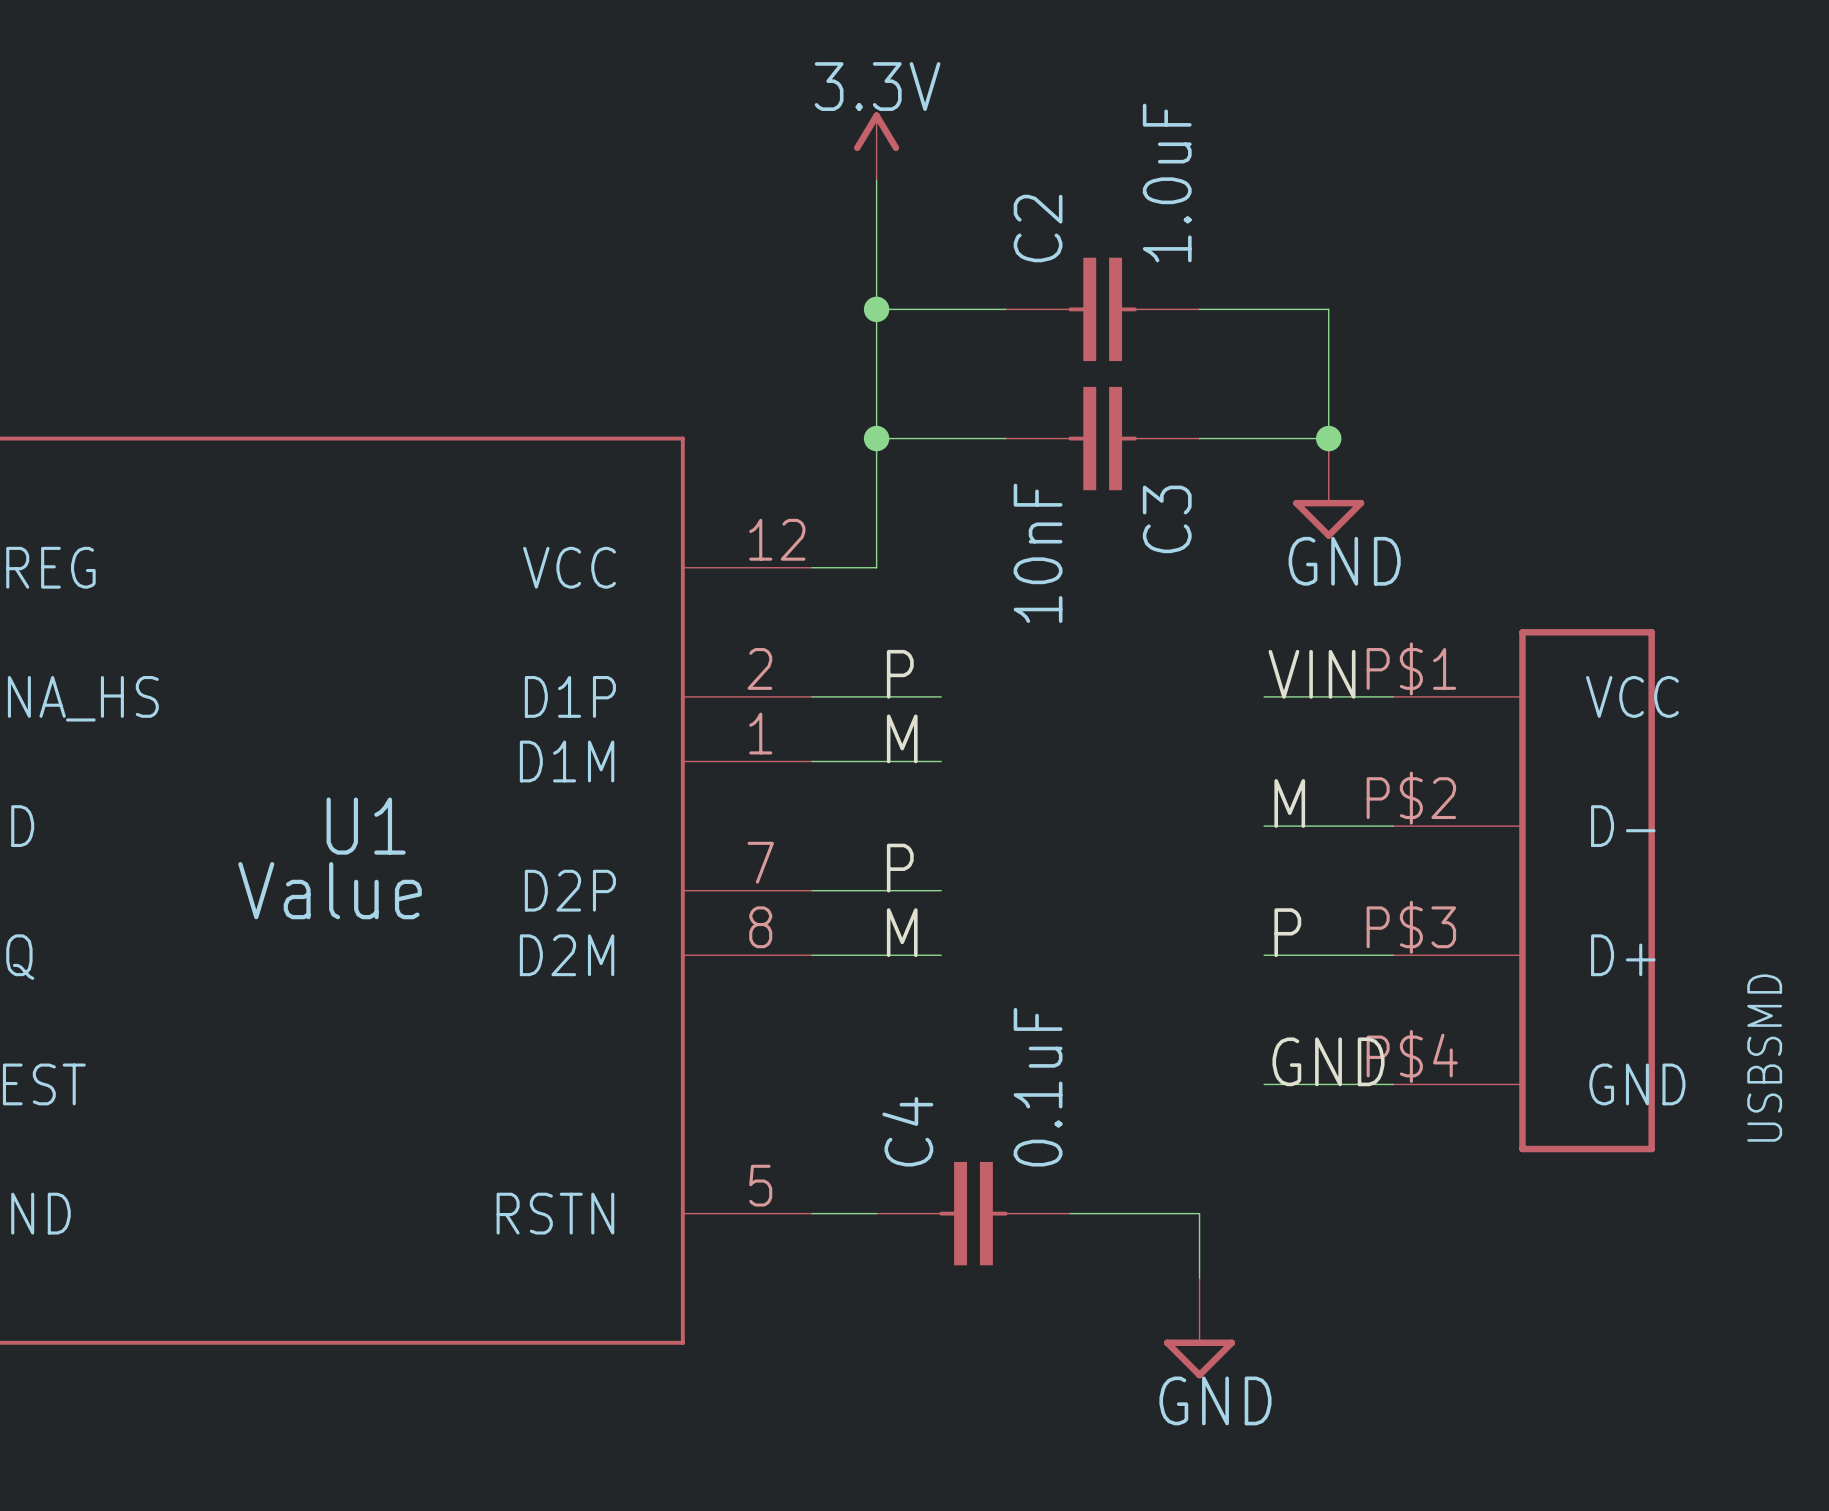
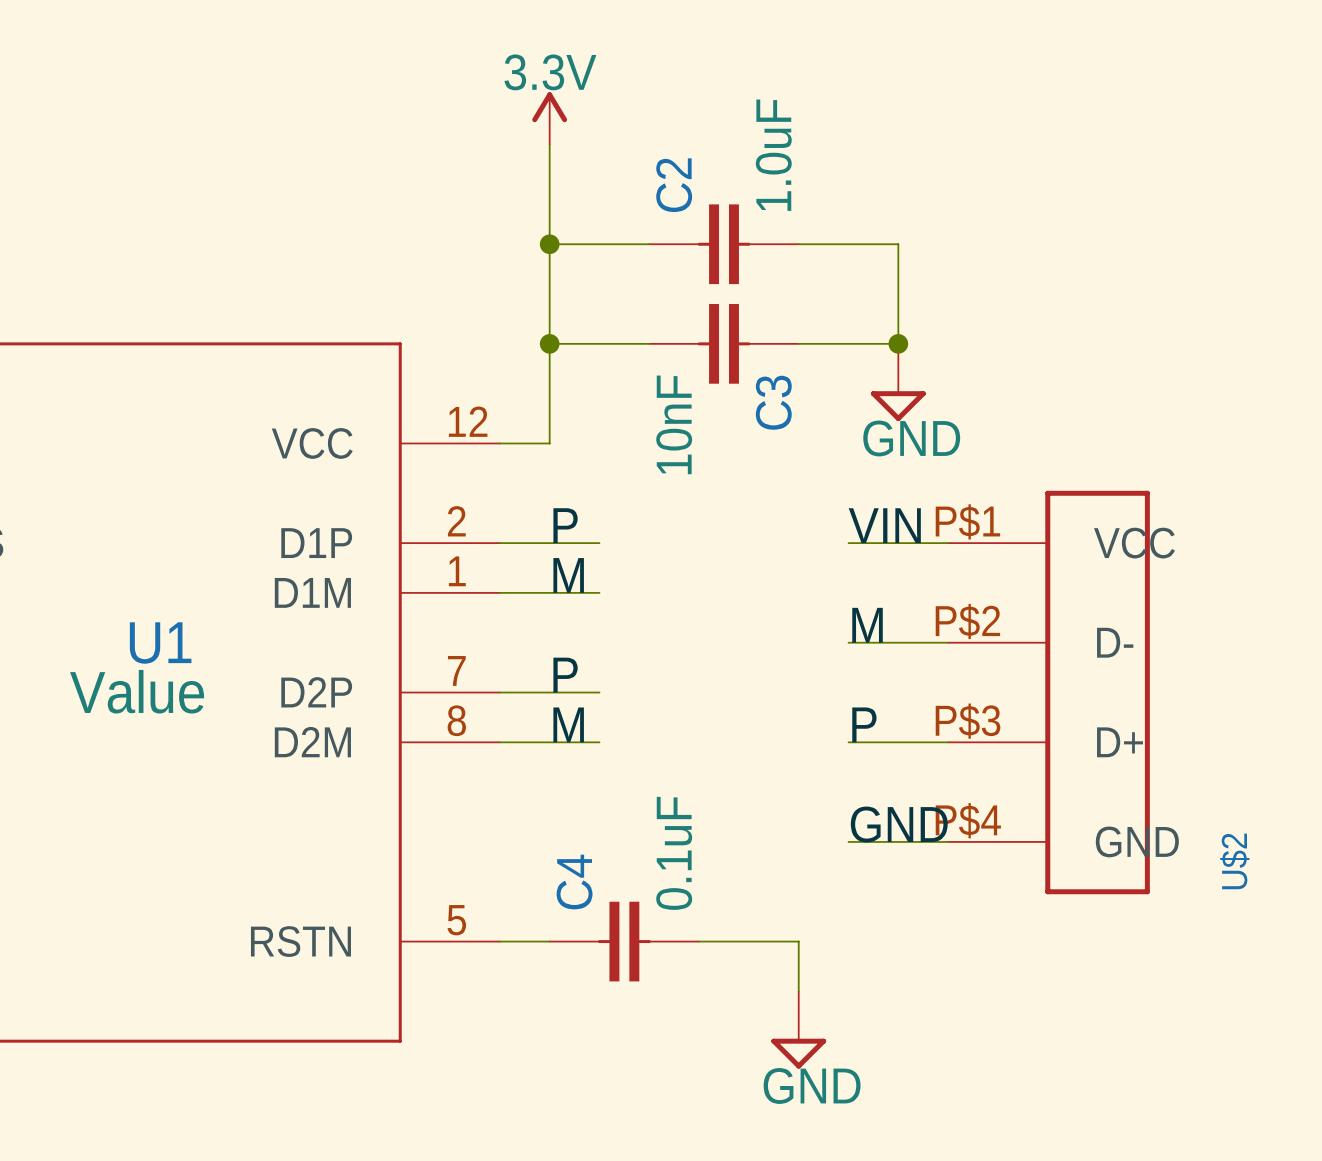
USBSMD name: USBSMD (1764, 1058) -> U$2 (1234, 861)

